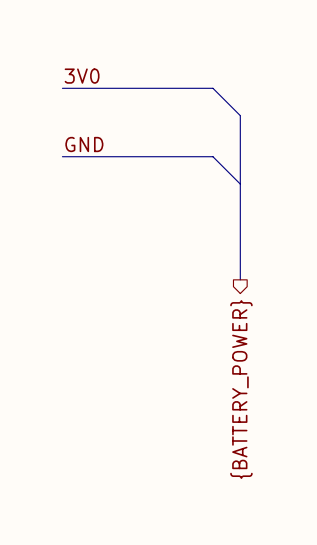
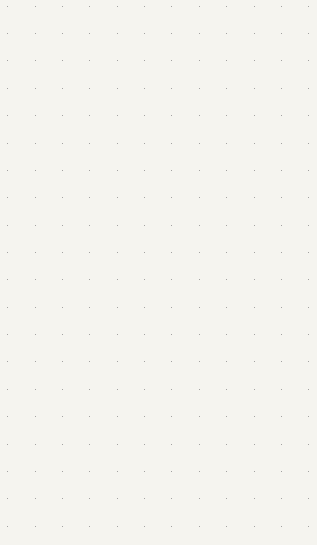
label: 3V0 (82, 76) -> none
wire: (62, 88) (212, 88) (240, 115) -> none
bus: (240, 115) (240, 279) -> none
label: GND (84, 144) -> none
wire: (62, 156) (212, 156) (240, 184) -> none
hierarchical label: {BATTERY_POWER} (241, 389) -> none

